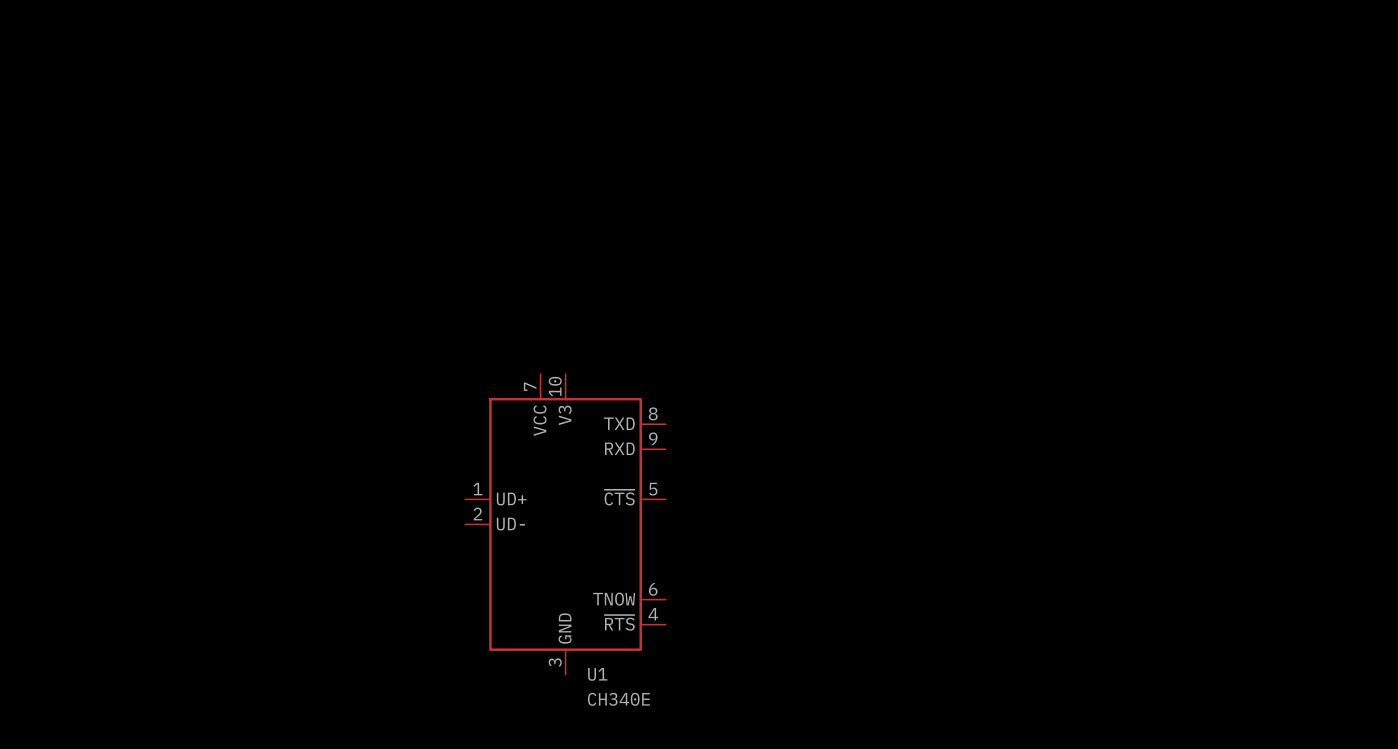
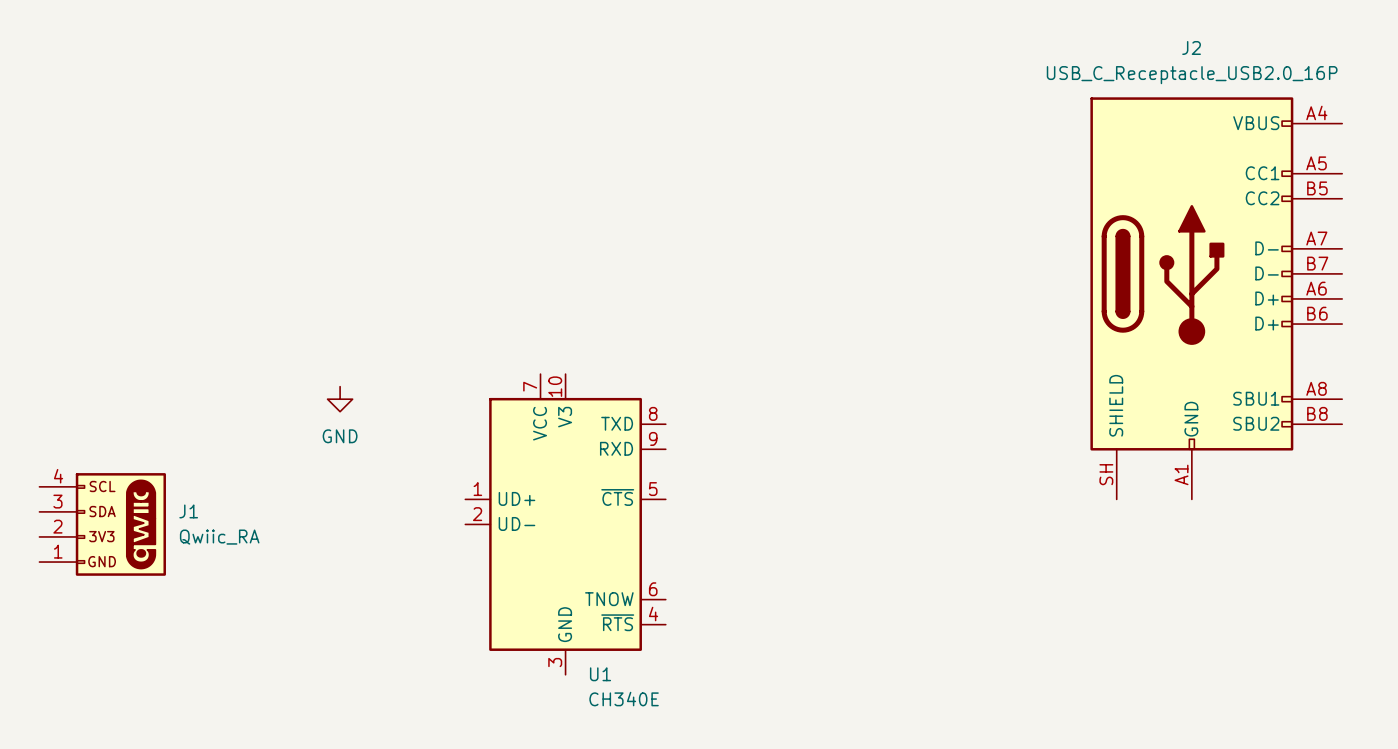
J2: none -> USB_C_Receptacle_USB2.0_16P (1216, 298)
power symbol: none -> GND (340, 399)
J1: none -> Qwiic_RA (102, 524)

